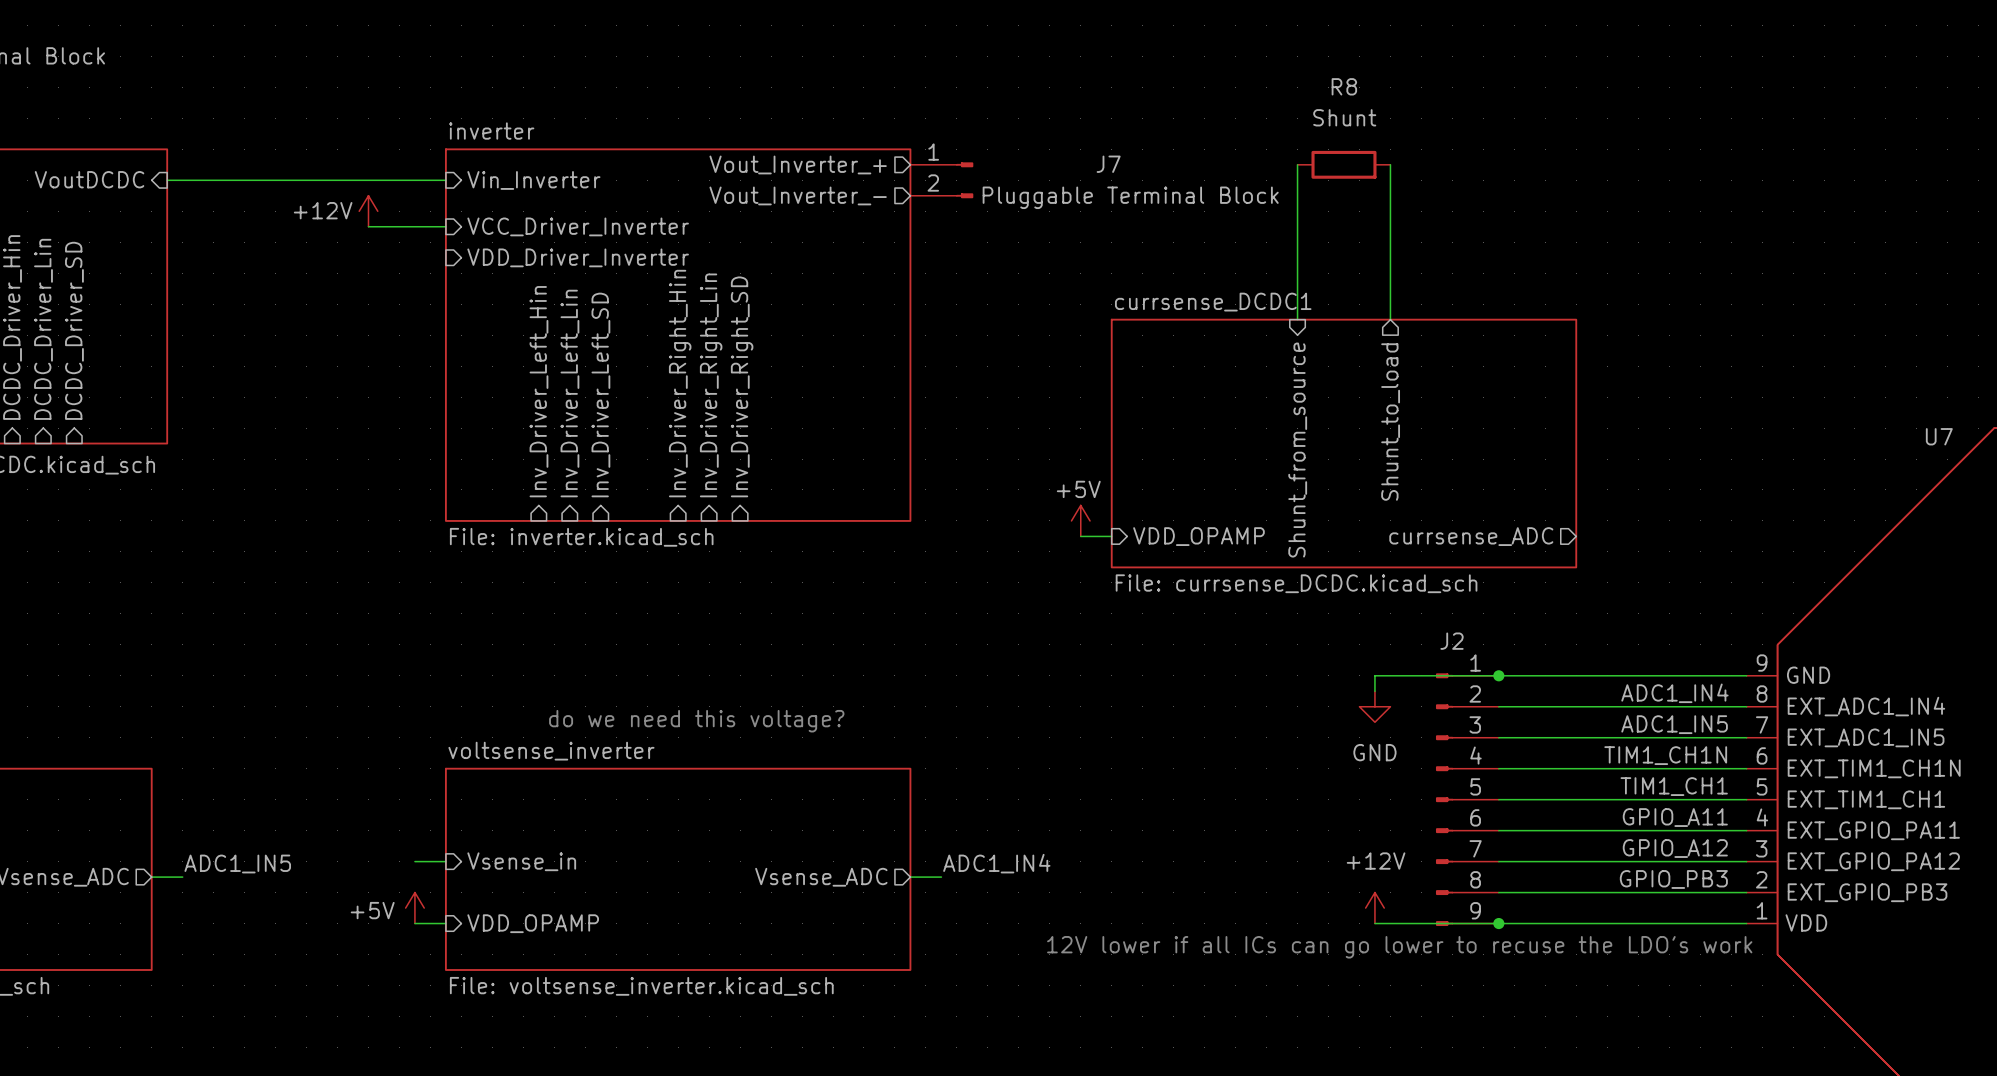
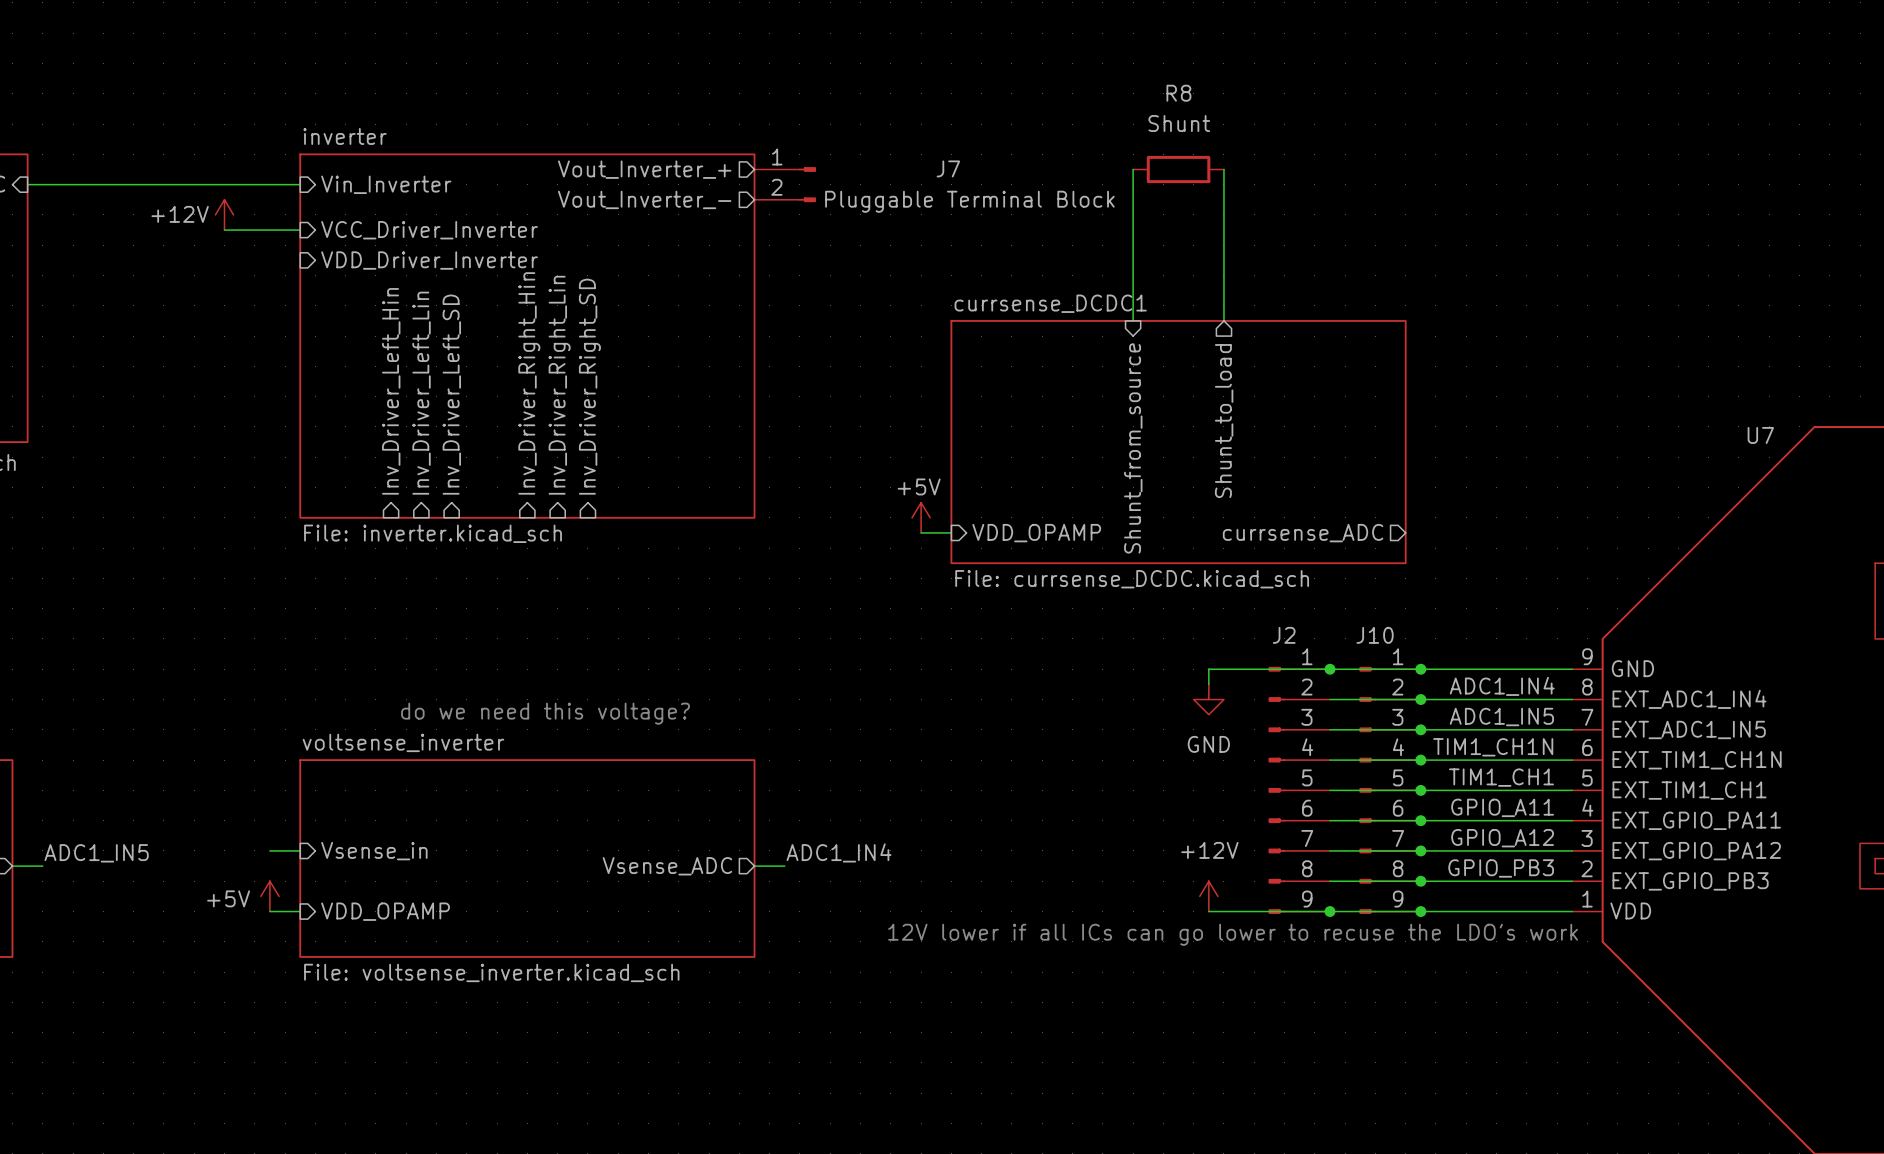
junction: none -> (1420, 669)
junction: none -> (1420, 699)
junction: none -> (1420, 729)
junction: none -> (1420, 760)
J10: none -> (1390, 790)
junction: none -> (1420, 790)
junction: none -> (1420, 820)
junction: none -> (1420, 850)
junction: none -> (1420, 881)
junction: none -> (1420, 911)

